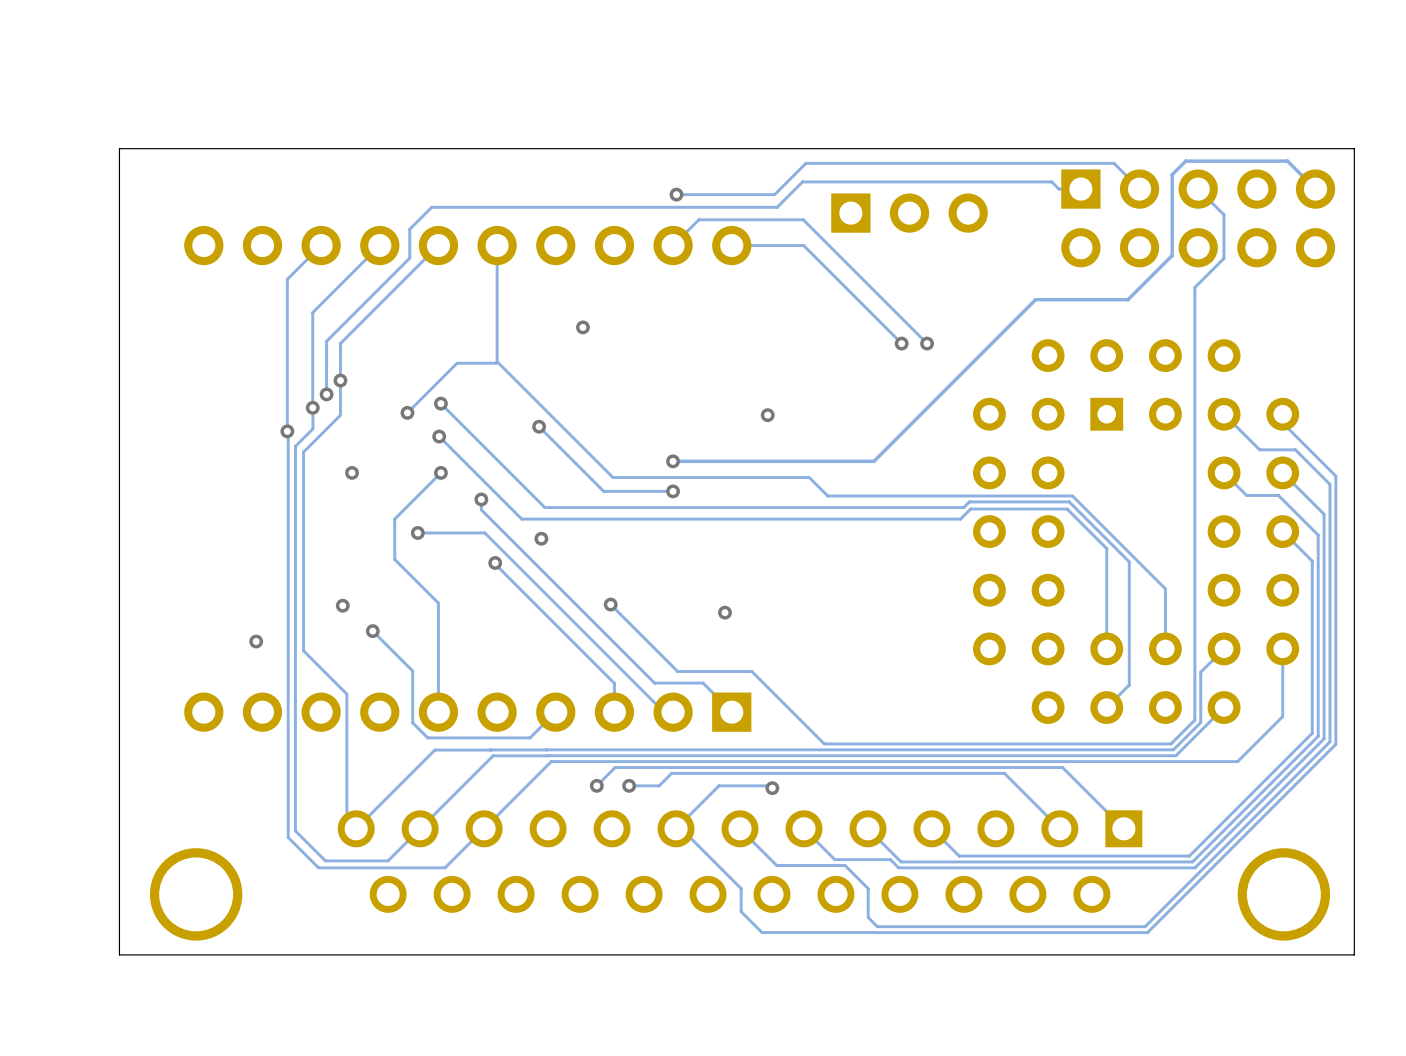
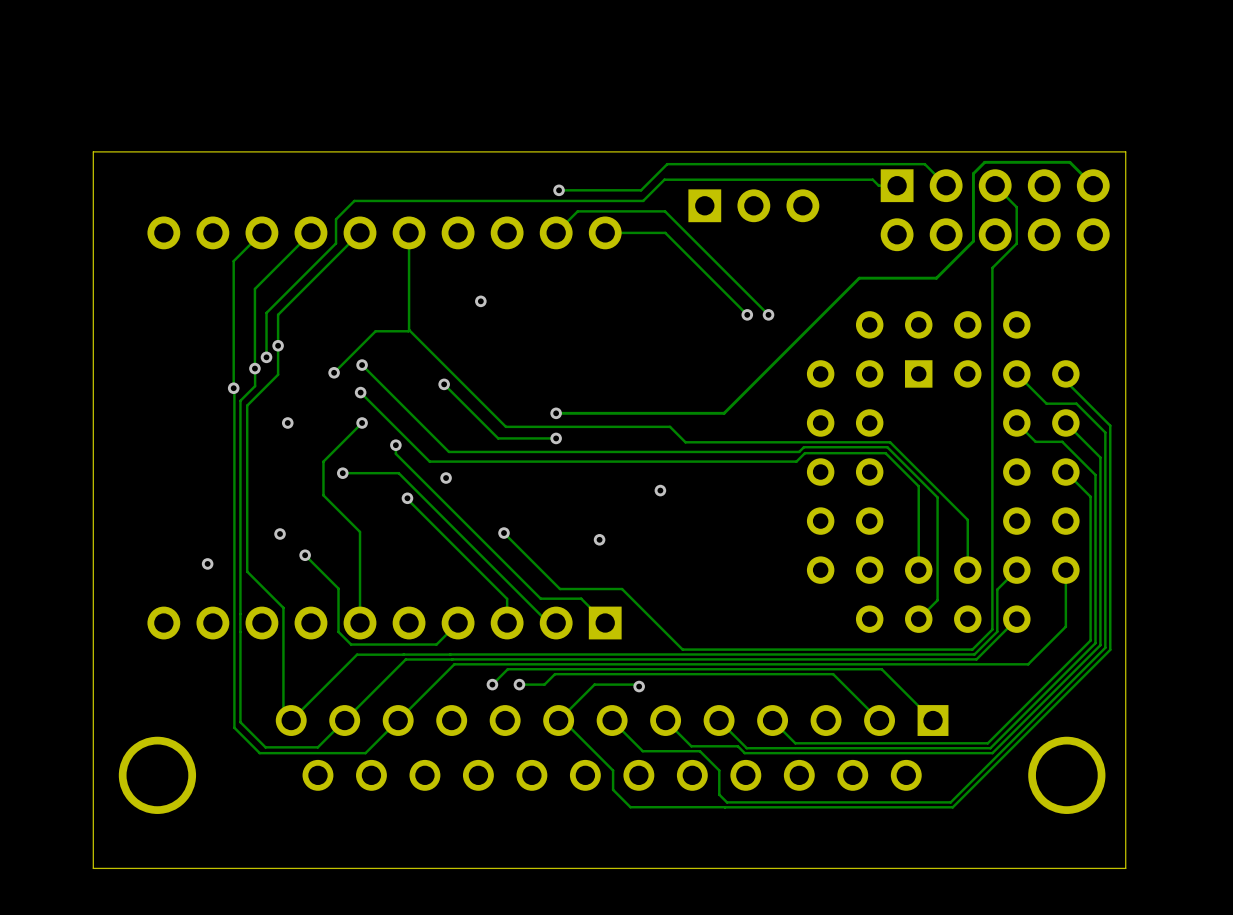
via: (767, 415) -> none
via: none -> (660, 490)
board edge: (1354, 954) (119, 954) -> (1125, 825) (1125, 868) (93, 868) (93, 825)

